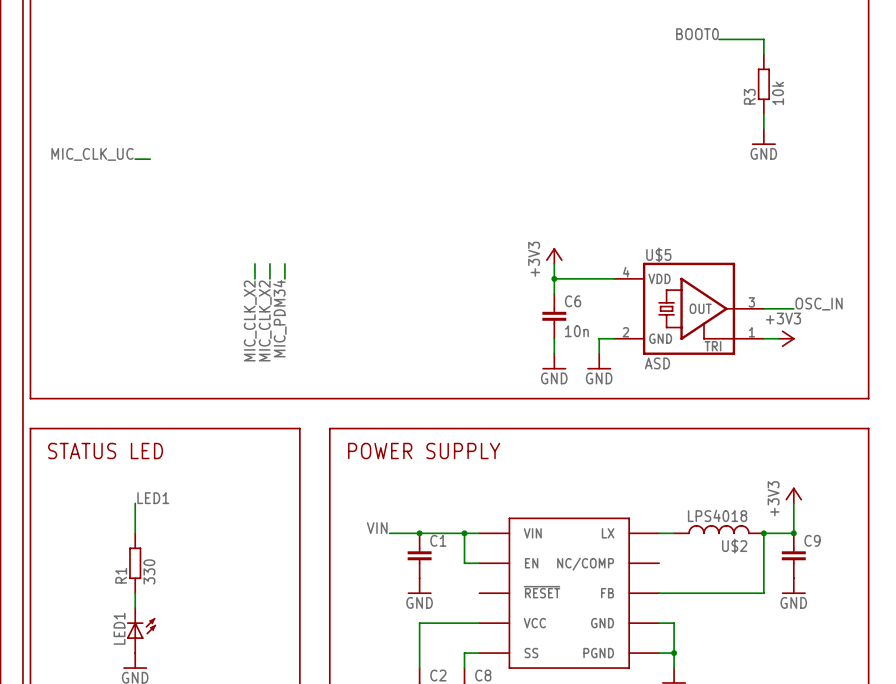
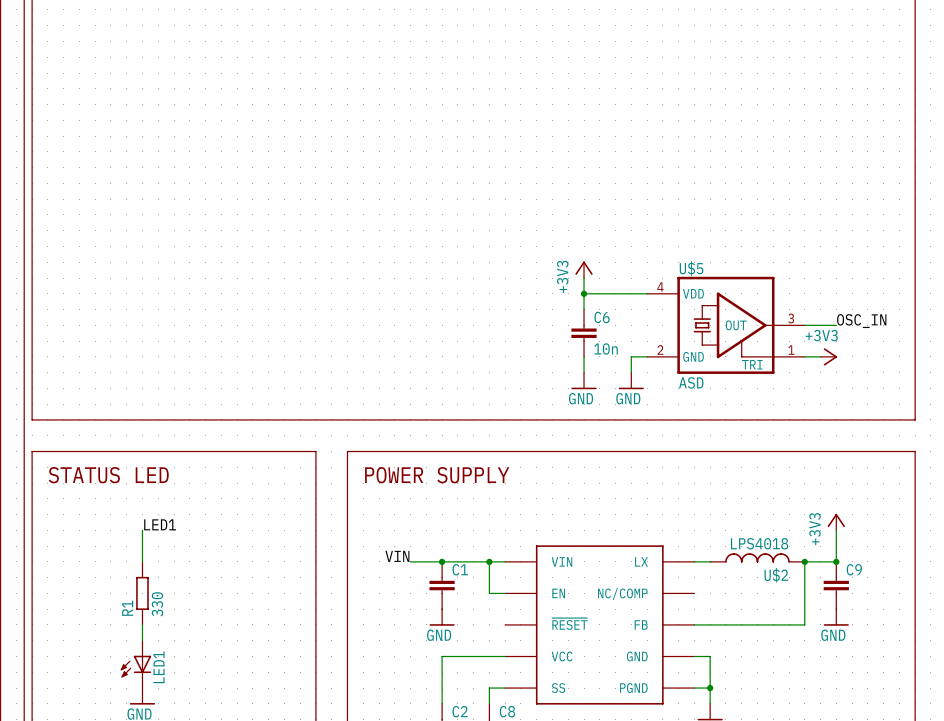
label: BOOT0 (697, 34) -> none
wire: (718, 39) (763, 39) (763, 54) -> none
R3: 10k (763, 84) -> none
wire: (763, 114) (763, 129) -> none
power symbol: GND (763, 137) -> none
label: MIC_CLK_UC (92, 154) -> none
wire: (135, 159) (150, 159) -> none
wire: (254, 263) (254, 278) -> none
wire: (269, 263) (269, 278) -> none
wire: (284, 263) (284, 278) -> none
label: MIC_PDM34 (279, 318) -> none
label: MIC_CLK_X2 (250, 320) -> none
label: MIC_CLK_X2 (265, 320) -> none
LED1 rotation: 0° (141, 628) -> 180° (135, 666)

